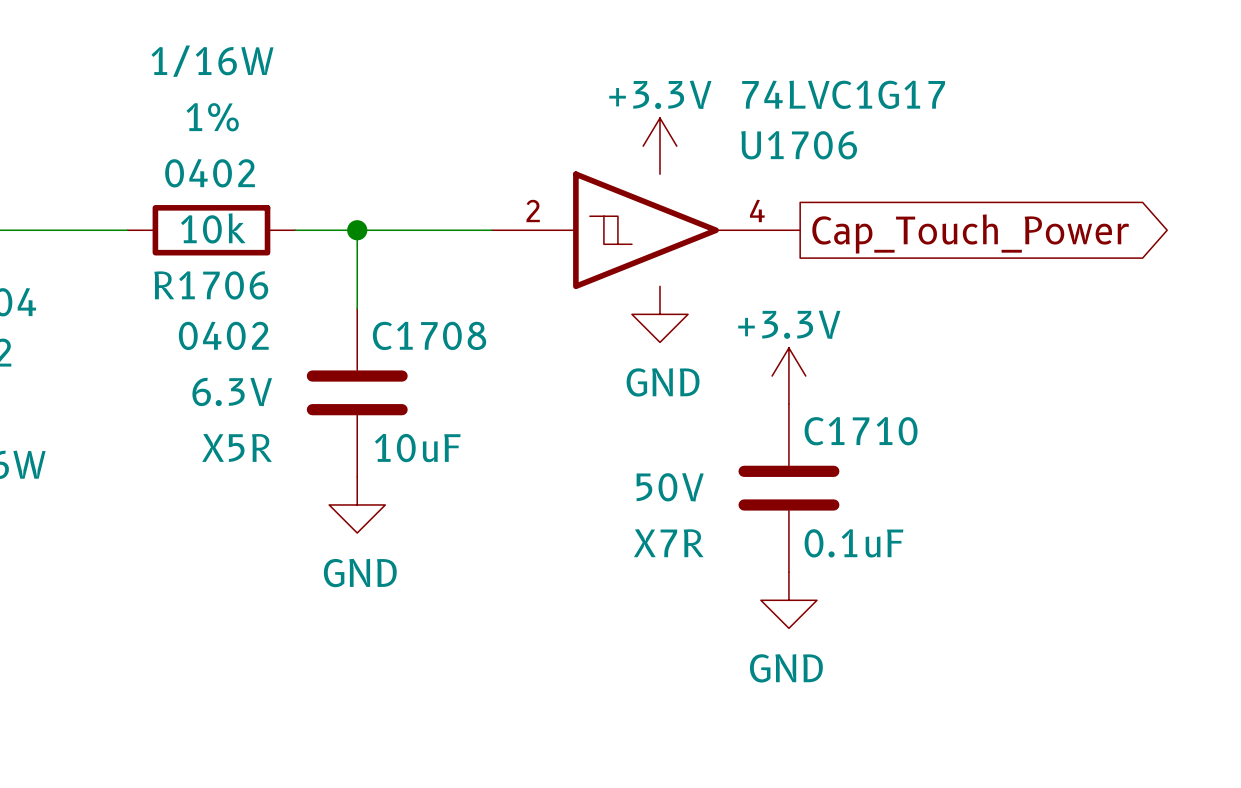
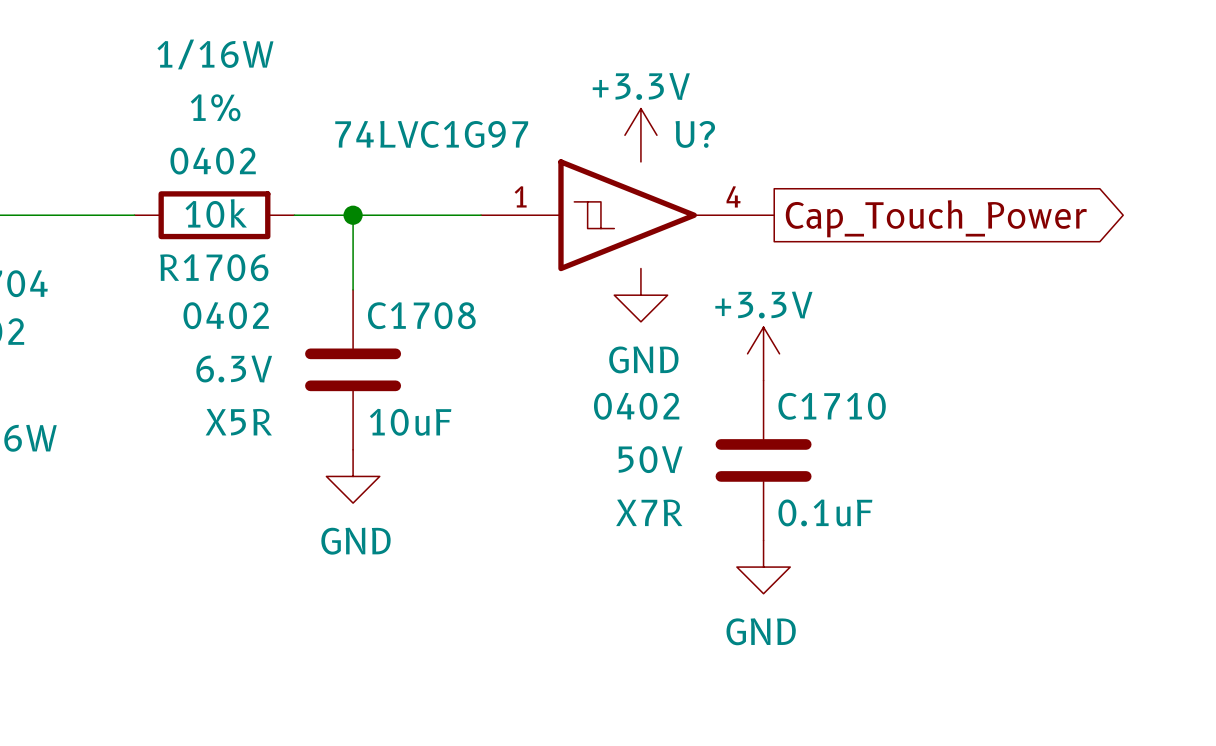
U1706 value: 74LVC1G17 (843, 94) -> 74LVC1G97 (431, 134)
U1706 name: U1706 (799, 145) -> U? (695, 134)
U1706 pin number: 2 (533, 210) -> 1 (520, 196)
C1710 text: none -> 0402 (636, 406)

